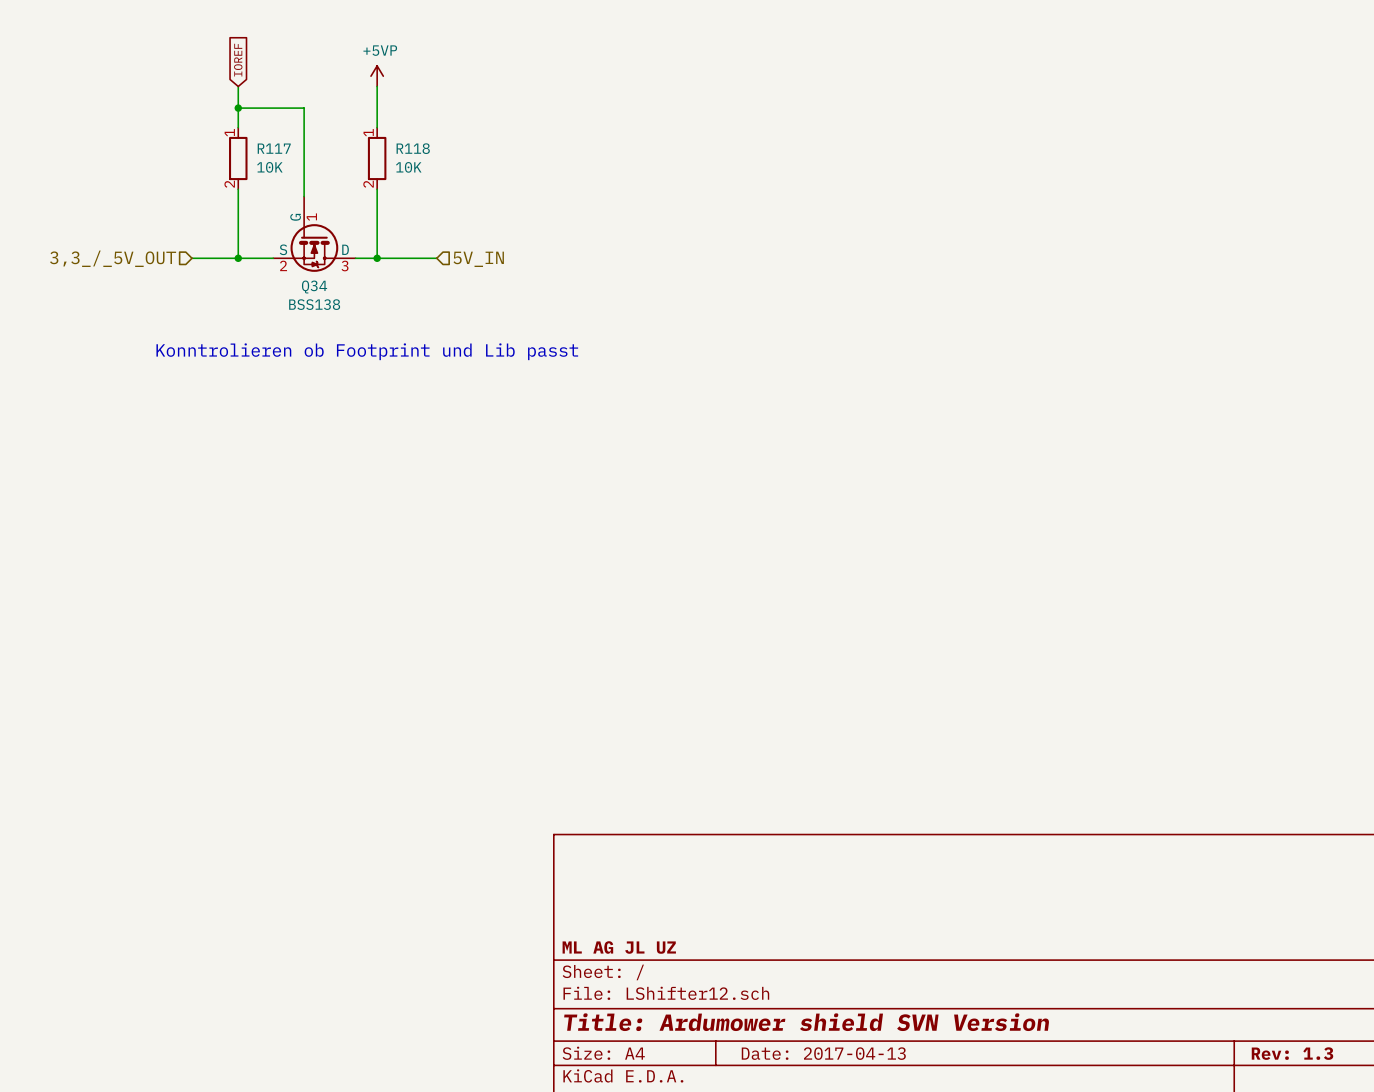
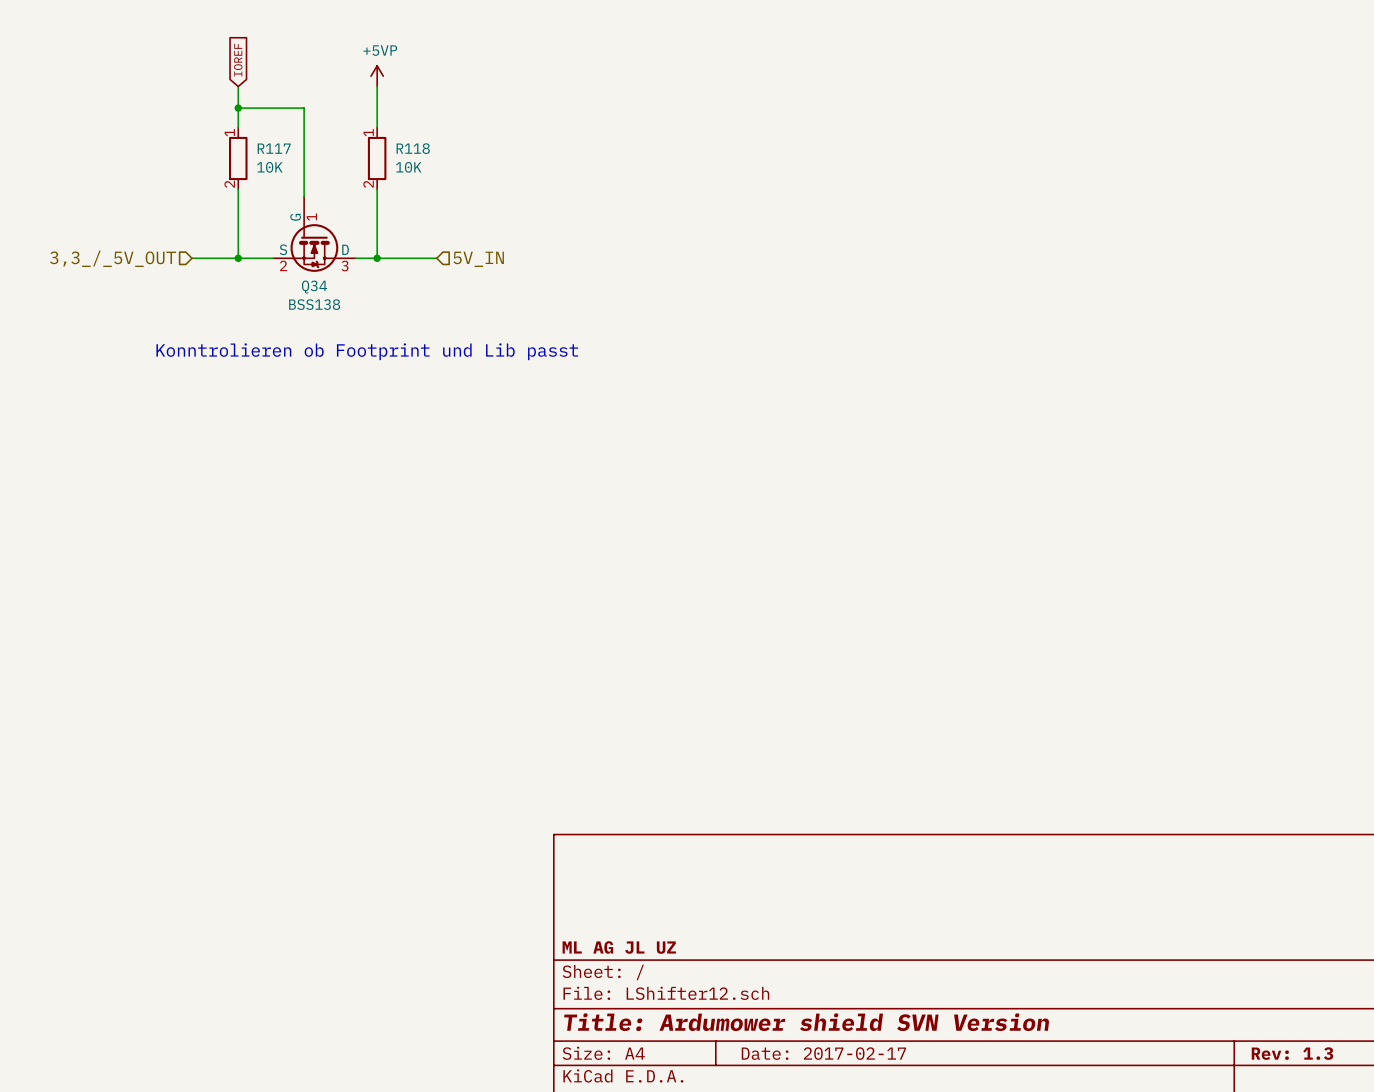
title block: Date: 2017-04-13 (823, 1053) -> Date: 2017-02-17 (823, 1053)

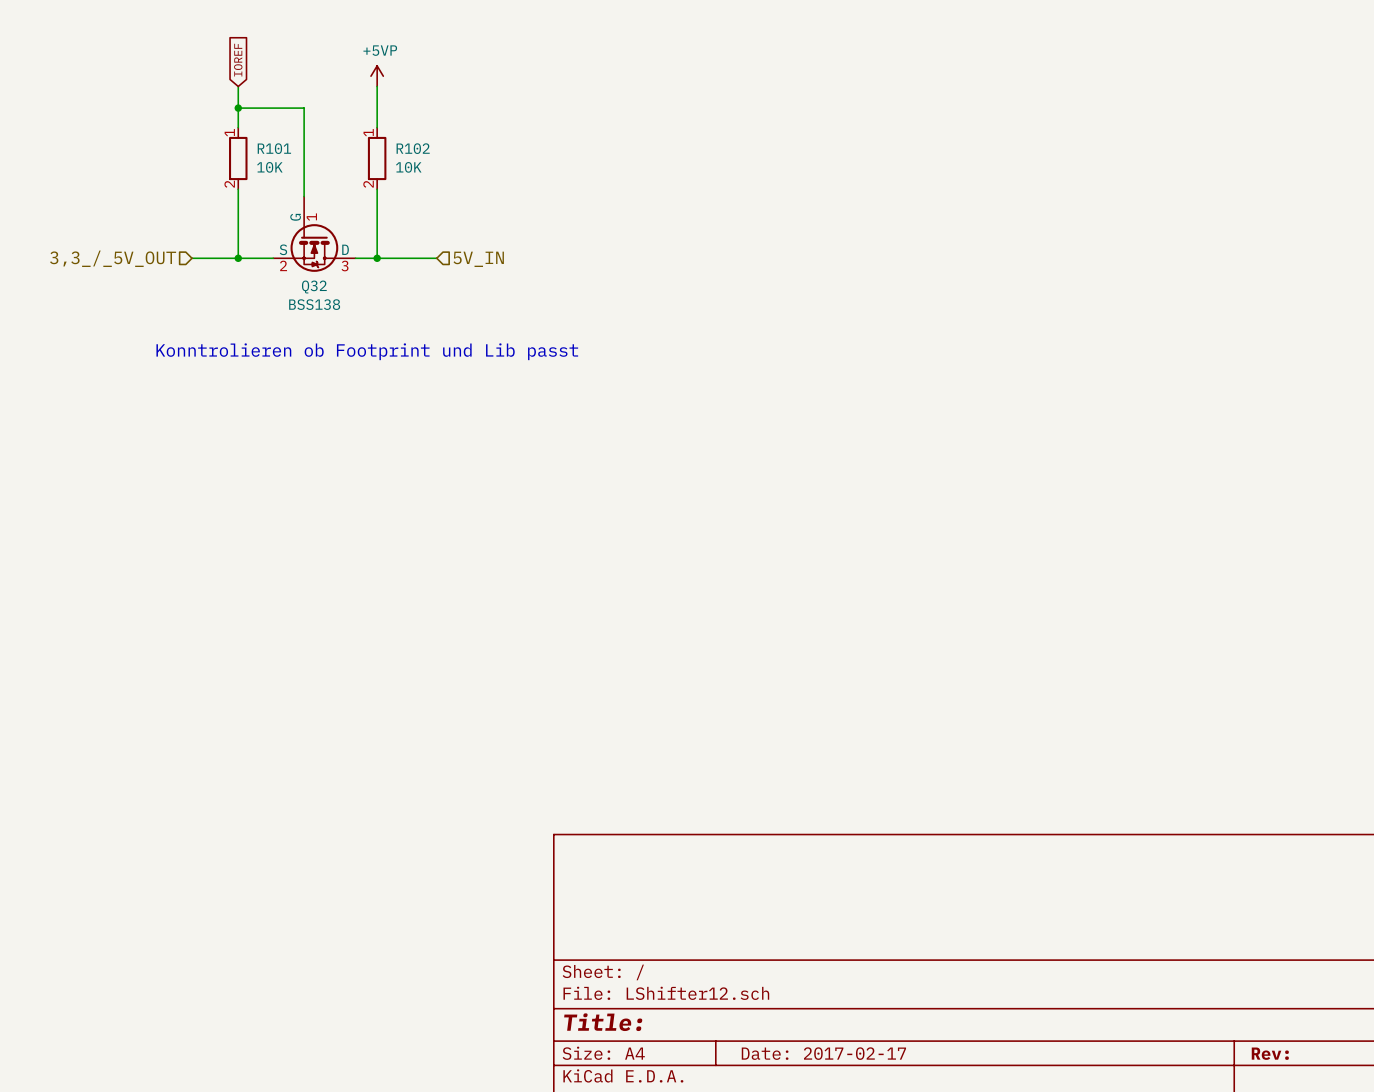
R117 name: R117 (274, 148) -> R101 (274, 148)
R118 name: R118 (413, 148) -> R102 (413, 148)
Q34 name: Q34 (314, 287) -> Q32 (314, 287)
title block: ML AG JL UZ (619, 947) -> none
title block: Title: Ardumower shield SVN Version (806, 1022) -> Title: (603, 1022)
title block: Rev: 1.3 (1292, 1053) -> Rev: (1270, 1053)

